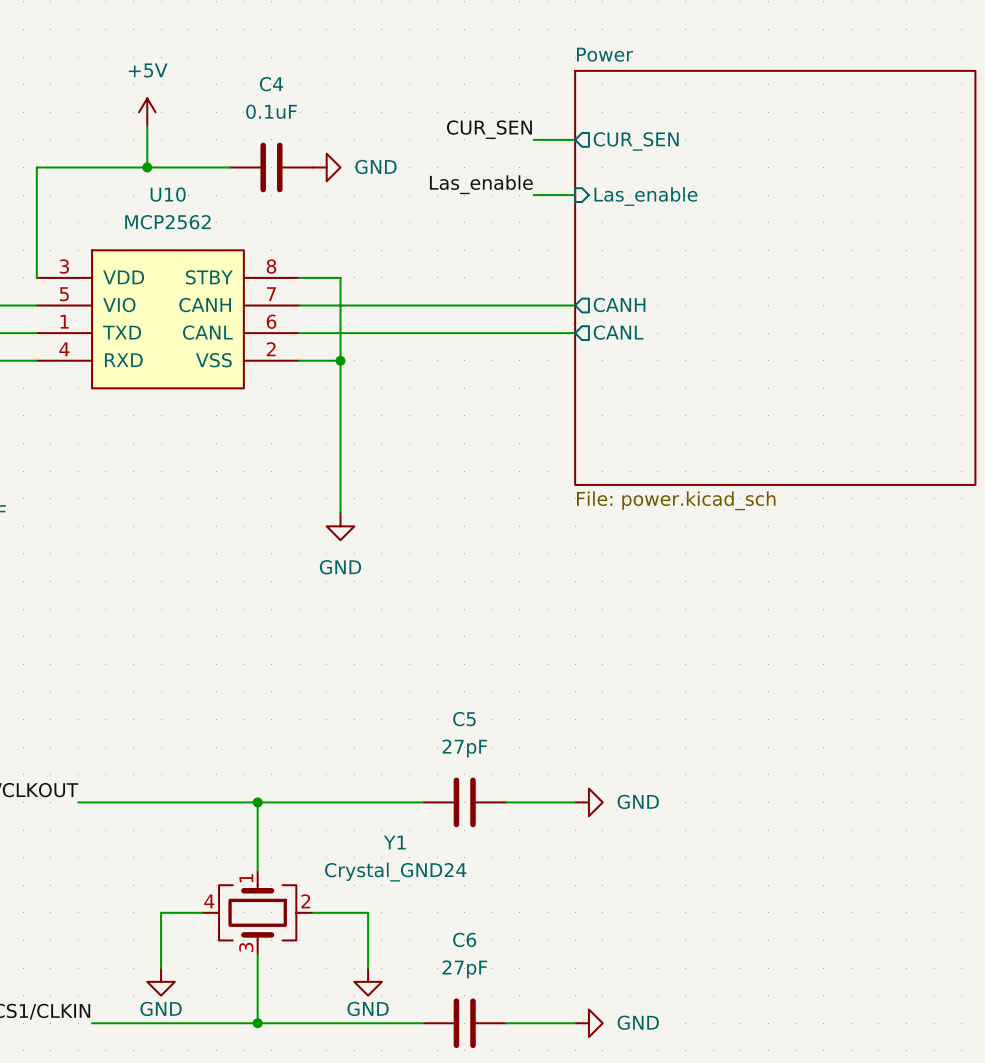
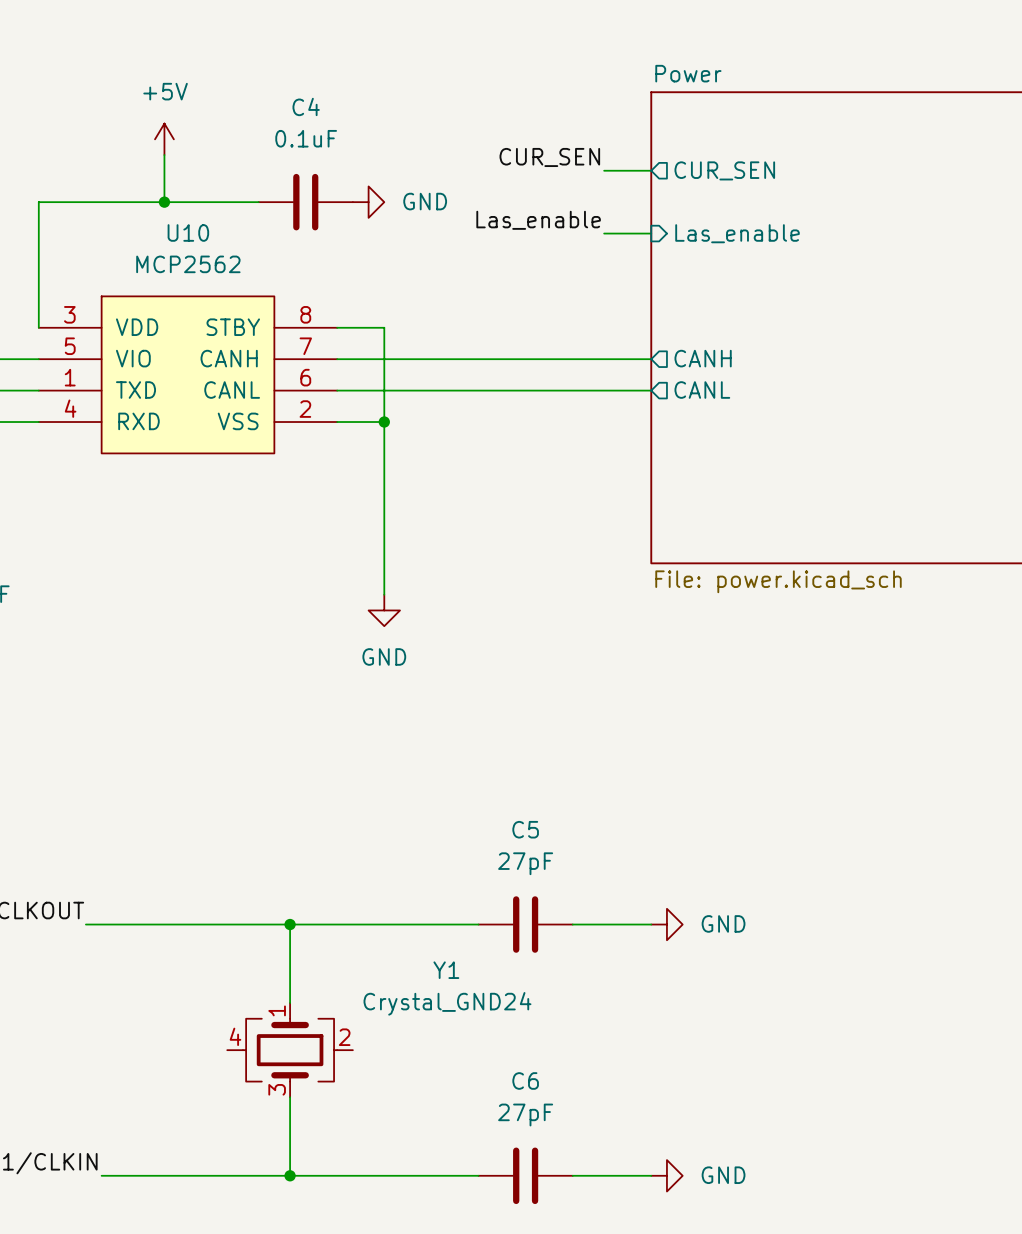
wire: (202, 912) (161, 912) (161, 968) -> none
wire: (312, 912) (368, 912) (368, 968) -> none
power symbol: GND (161, 981) -> none
power symbol: GND (368, 981) -> none

